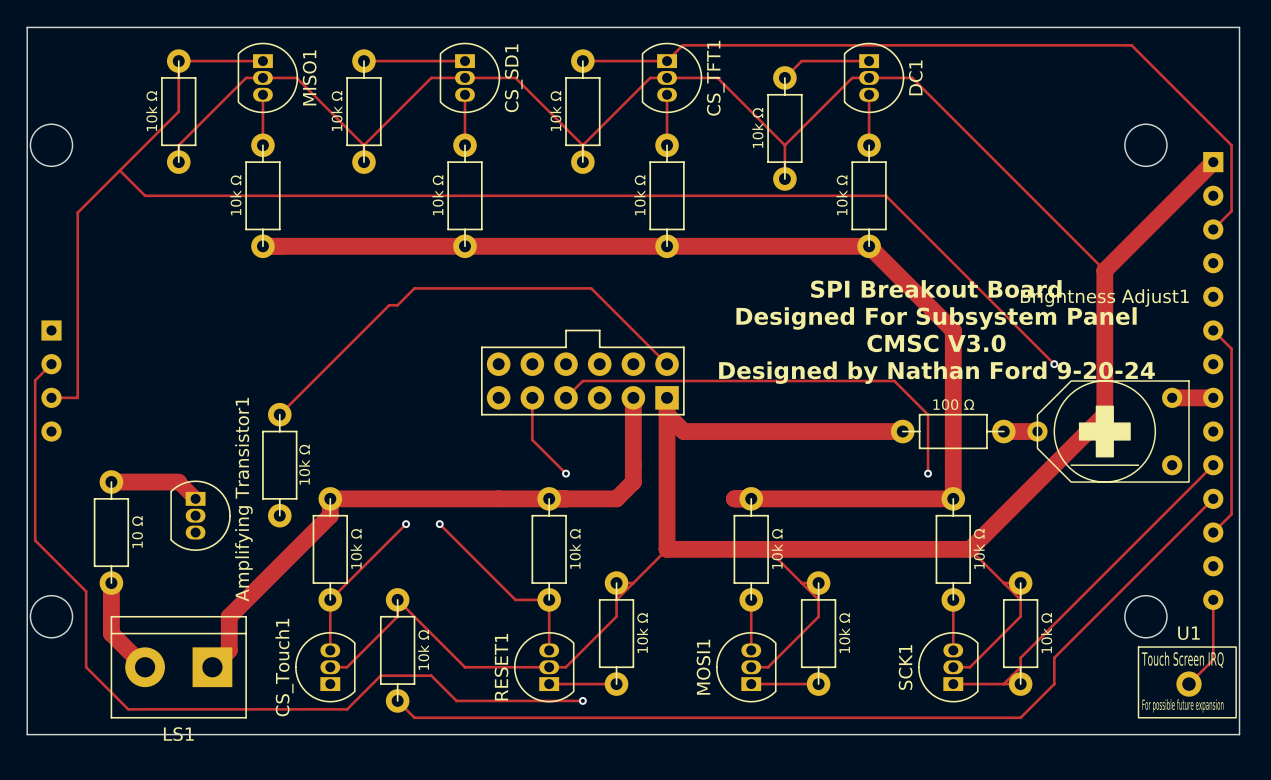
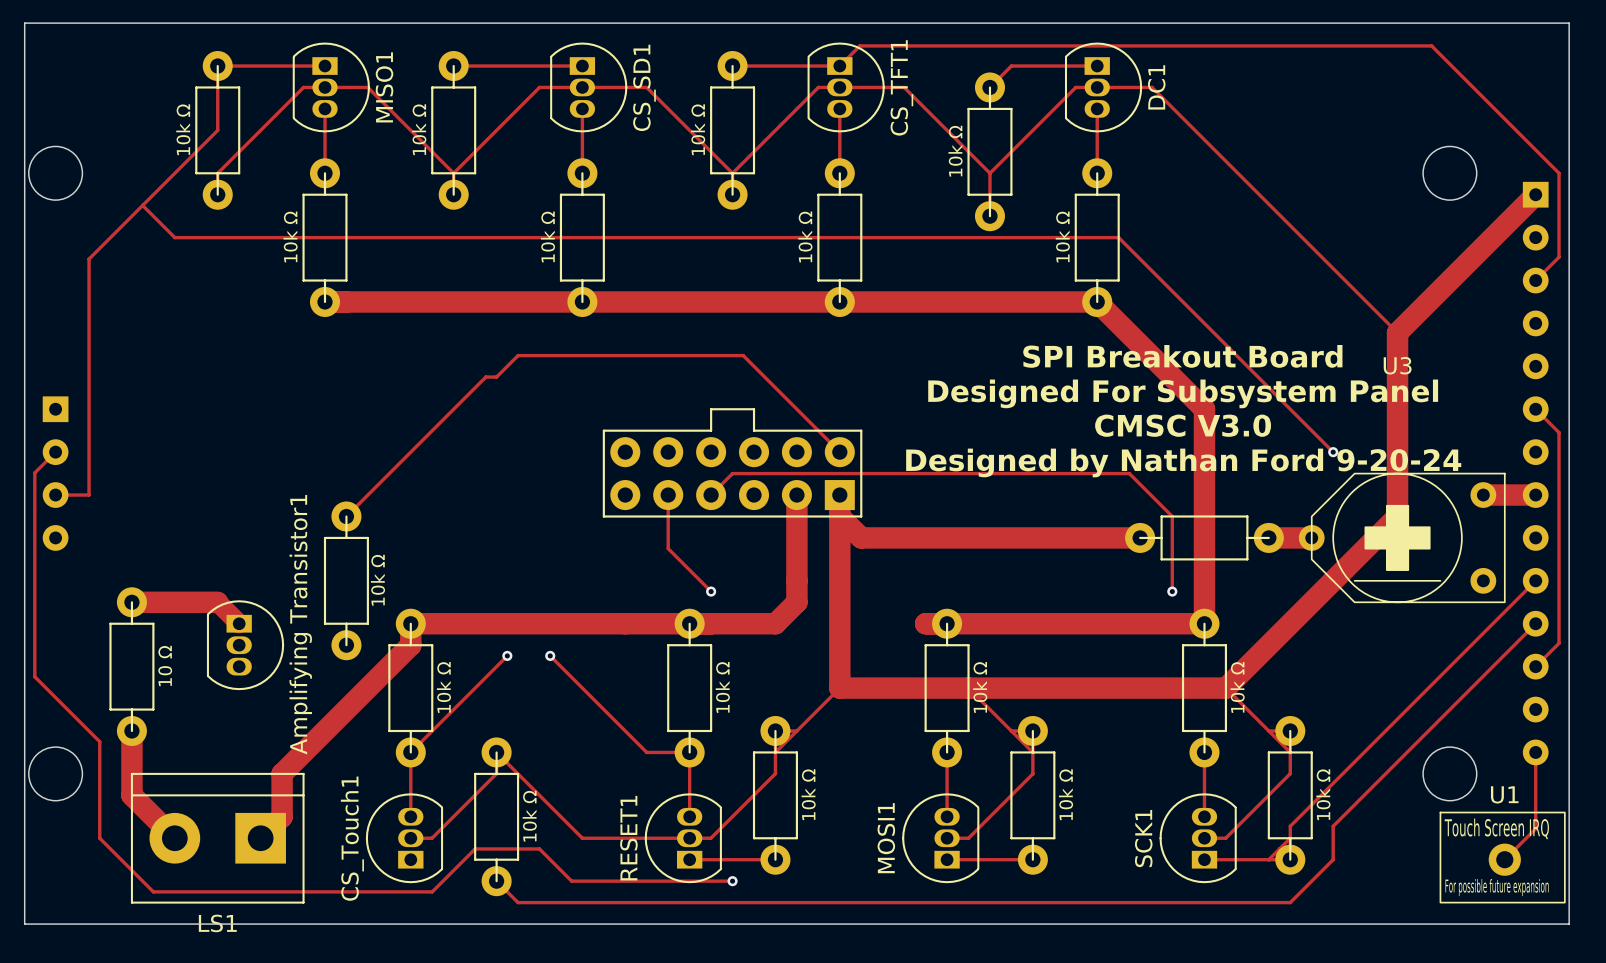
Brightness Adjust1 name: Brightness Adjust1 (1104, 297) -> U3 (1397, 365)
part value: 100 Ω (953, 404) -> none

